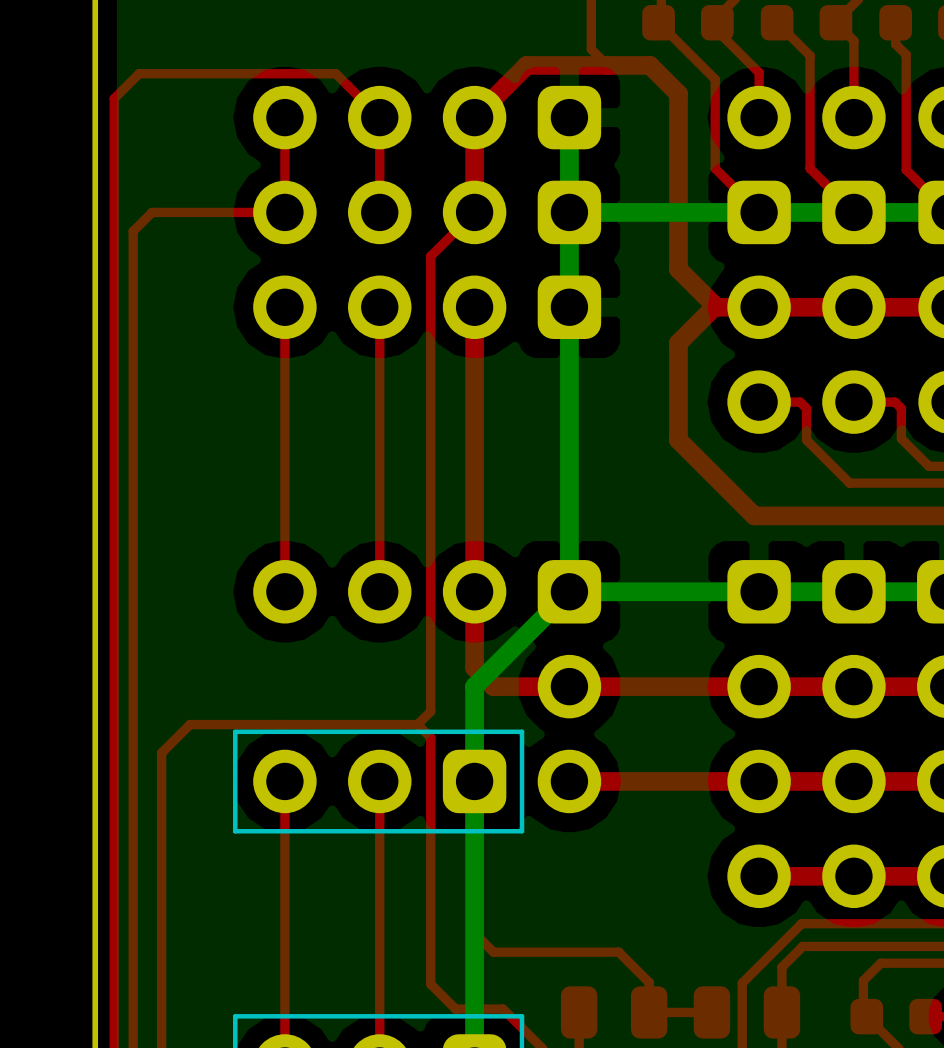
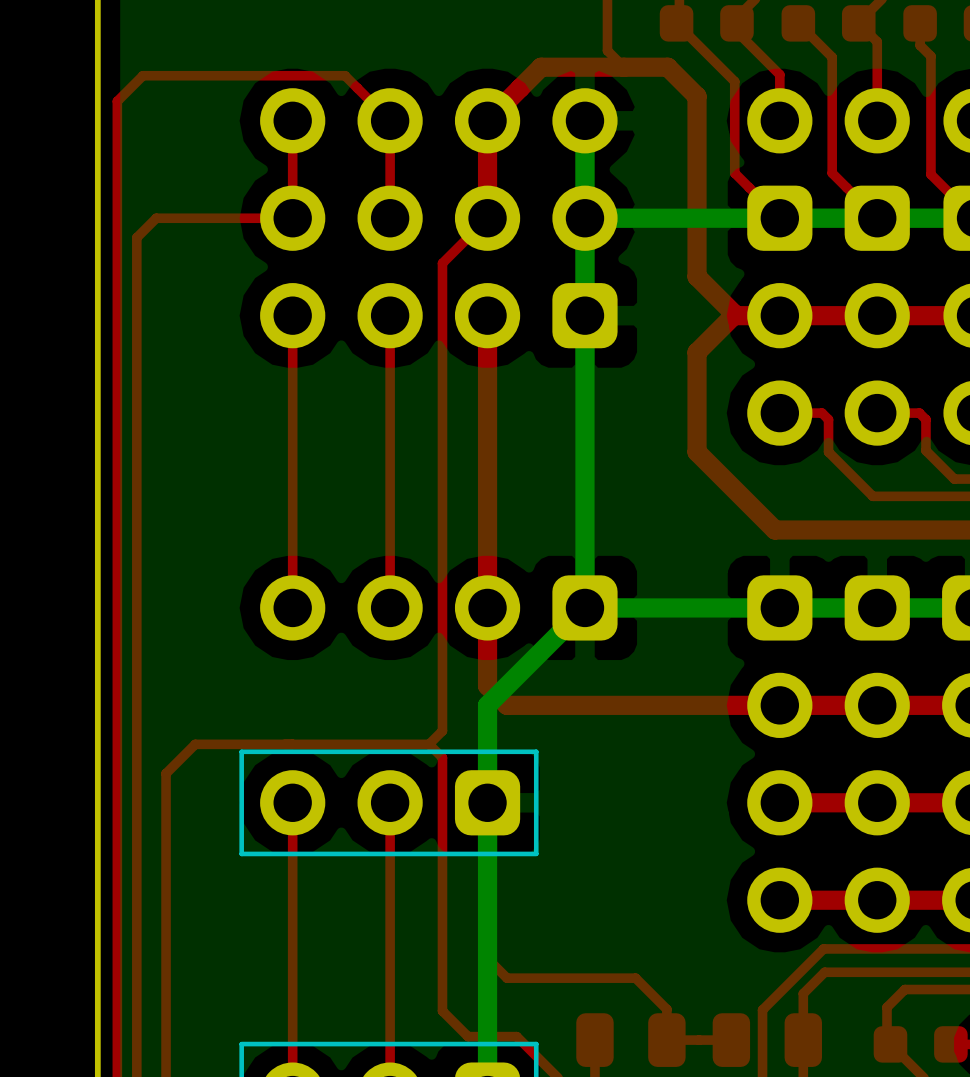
part footprint: [253, 85, 602, 150] -> [260, 88, 618, 154]
part footprint: [253, 180, 602, 245] -> [260, 185, 618, 251]
part: (569, 734) -> none
top track: (759, 781) (569, 781) -> none

